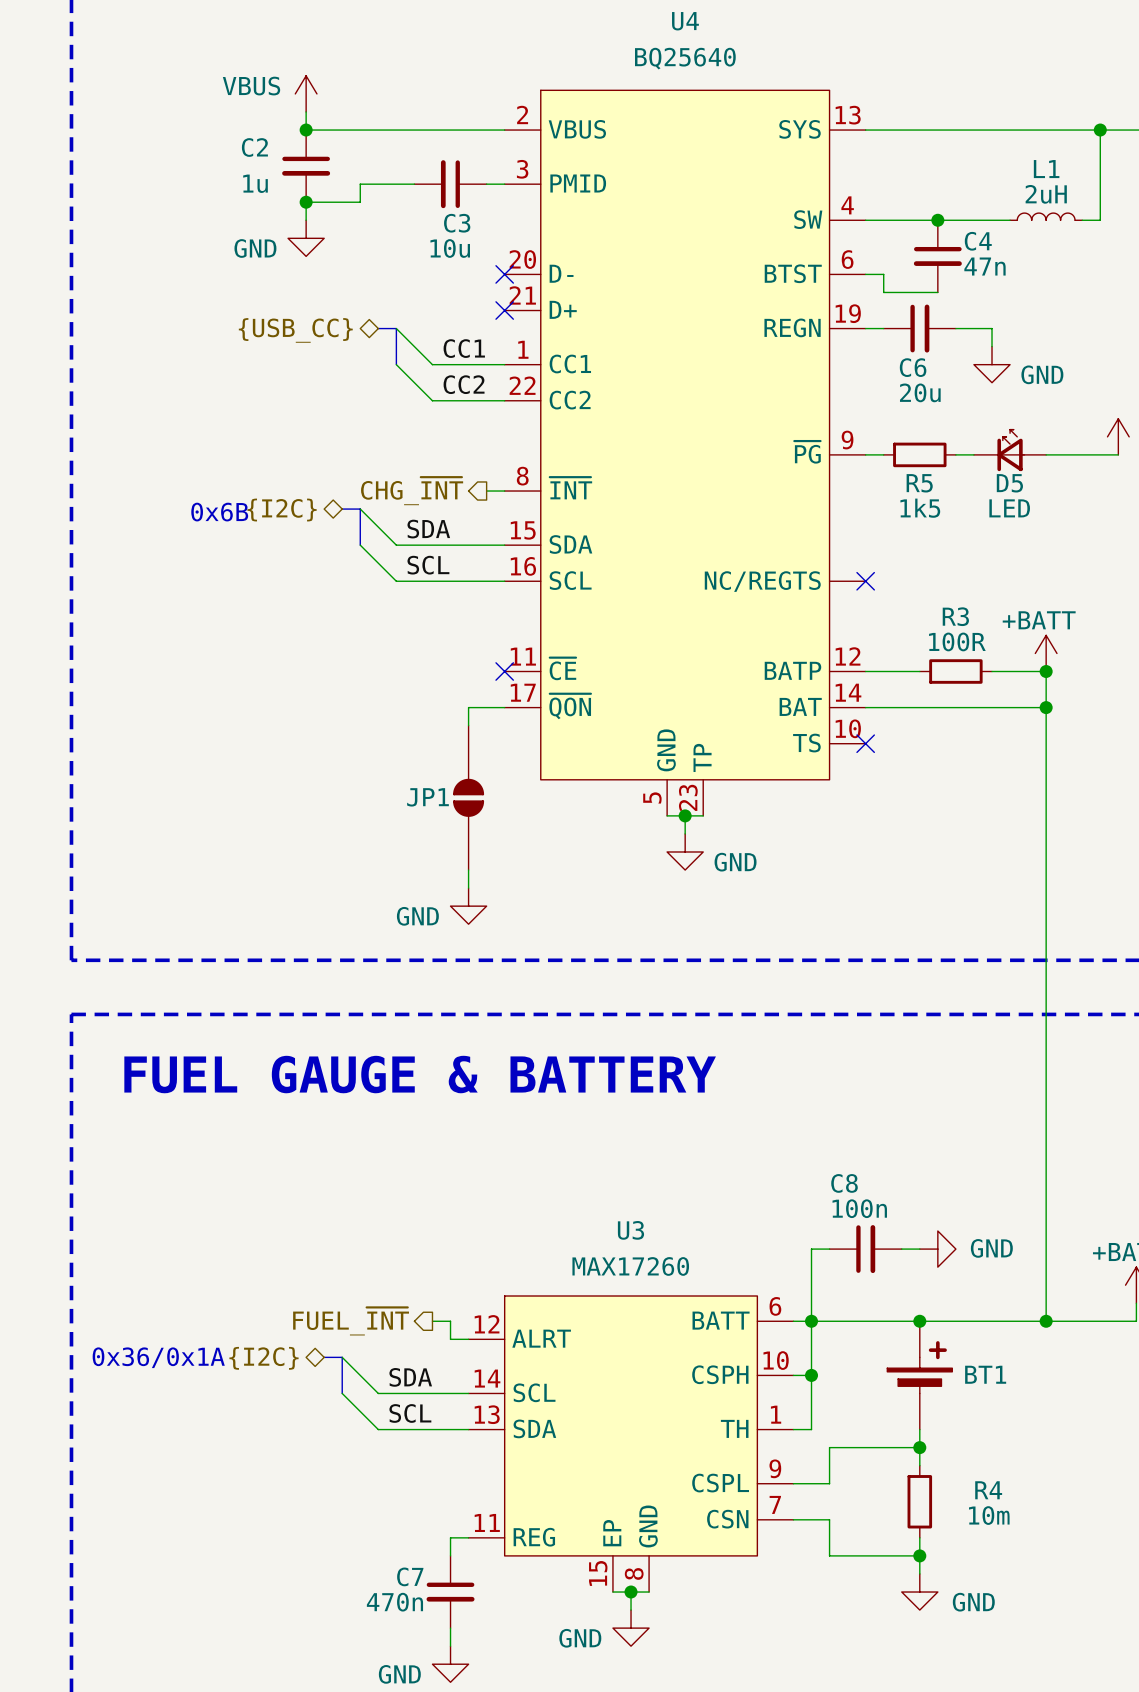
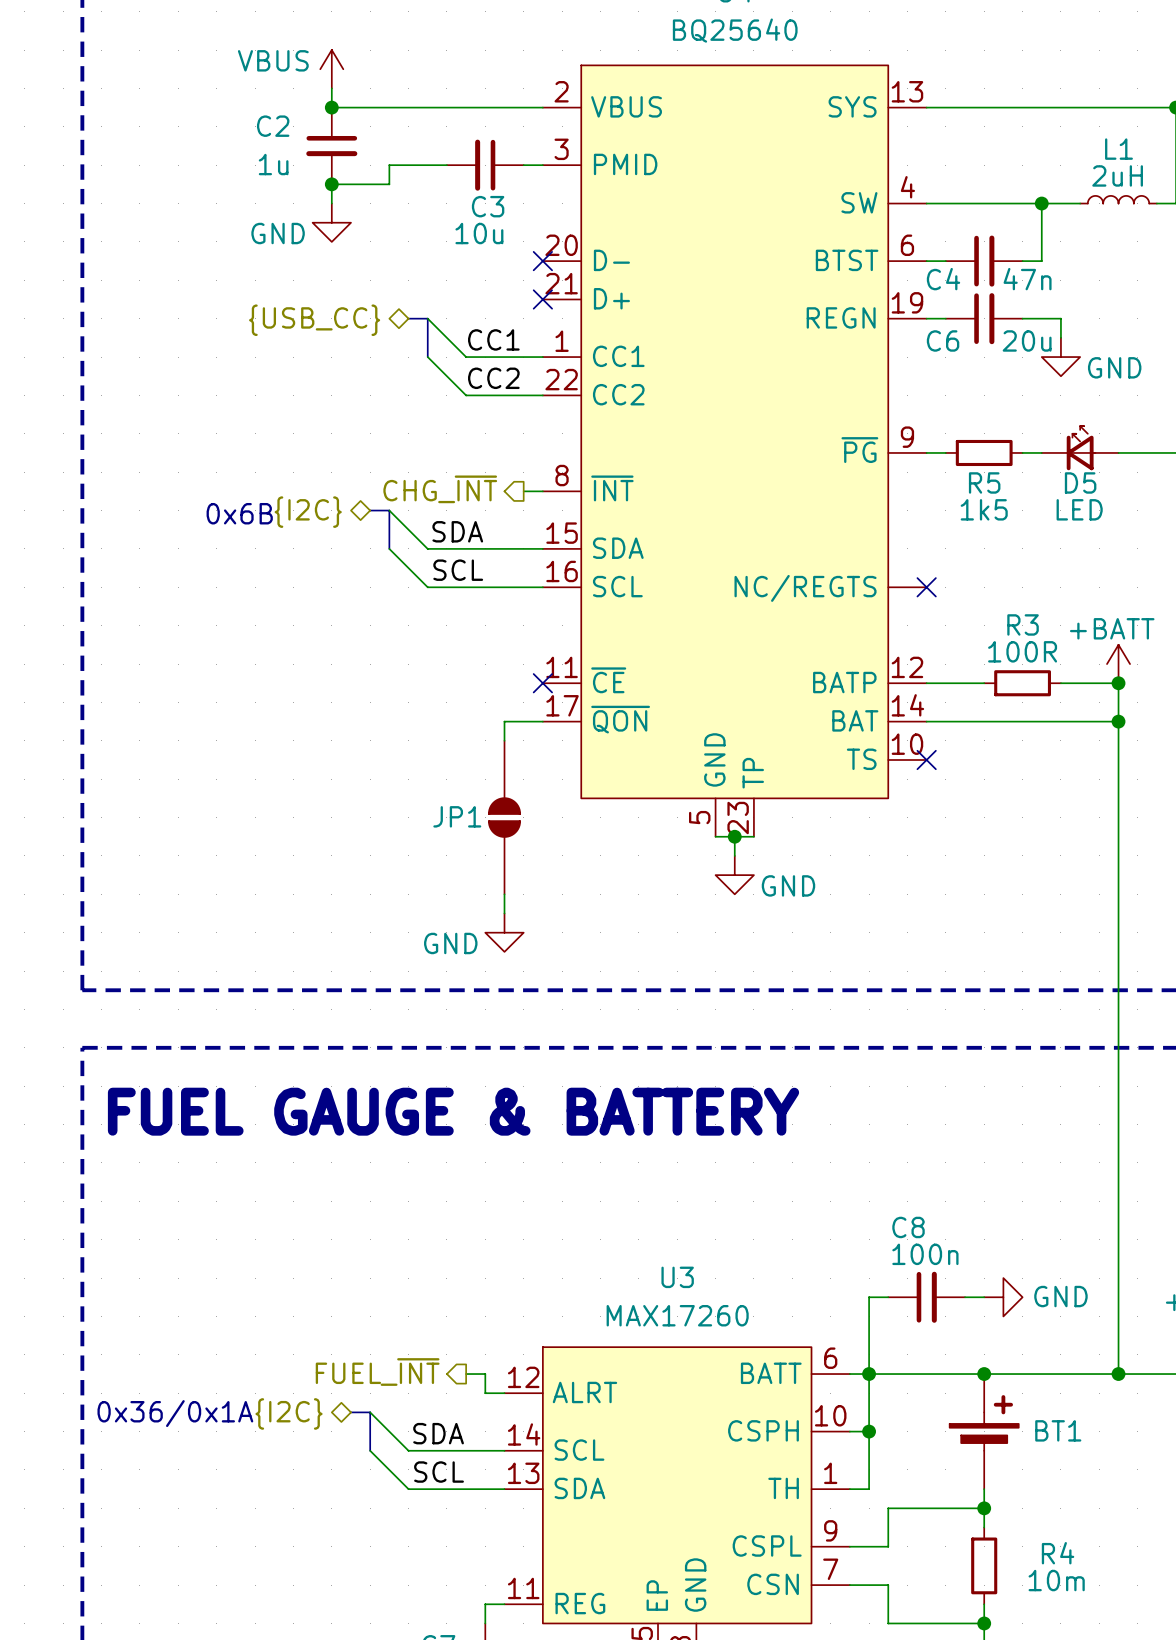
junction position: (937, 220) -> (1041, 203)
wire: none -> (1041, 203) (1041, 261) (1022, 261)
C4 name position: C4 (978, 241) -> C4 (943, 279)
C4 rotation: 0° (937, 256) -> 90° counterclockwise (984, 261)
wire: (883, 274) (883, 292) (937, 292) -> none
C6 name position: C6 (913, 367) -> C6 (943, 340)
C6 value position: 20u (920, 392) -> 20u (1027, 340)

